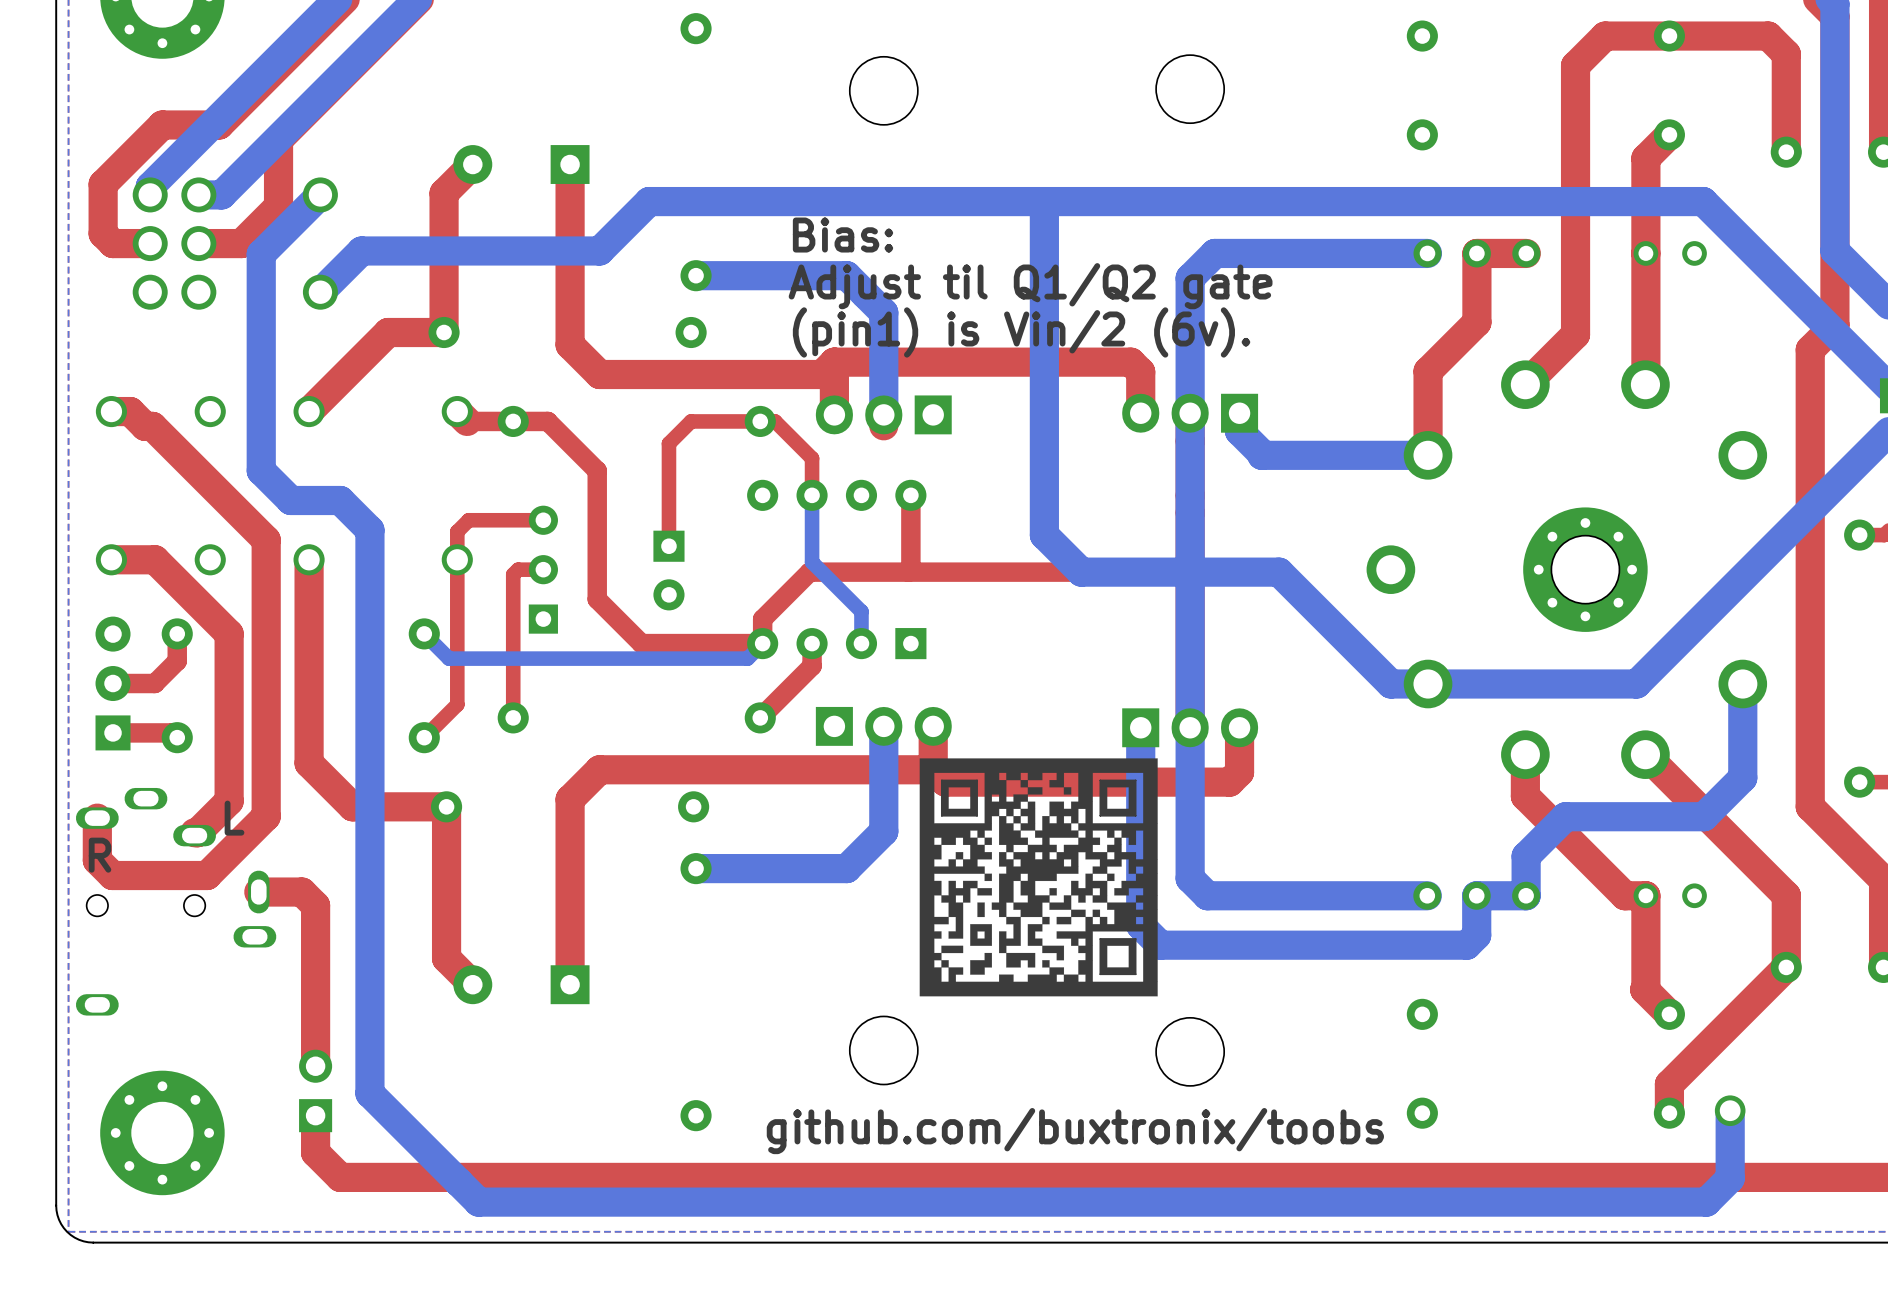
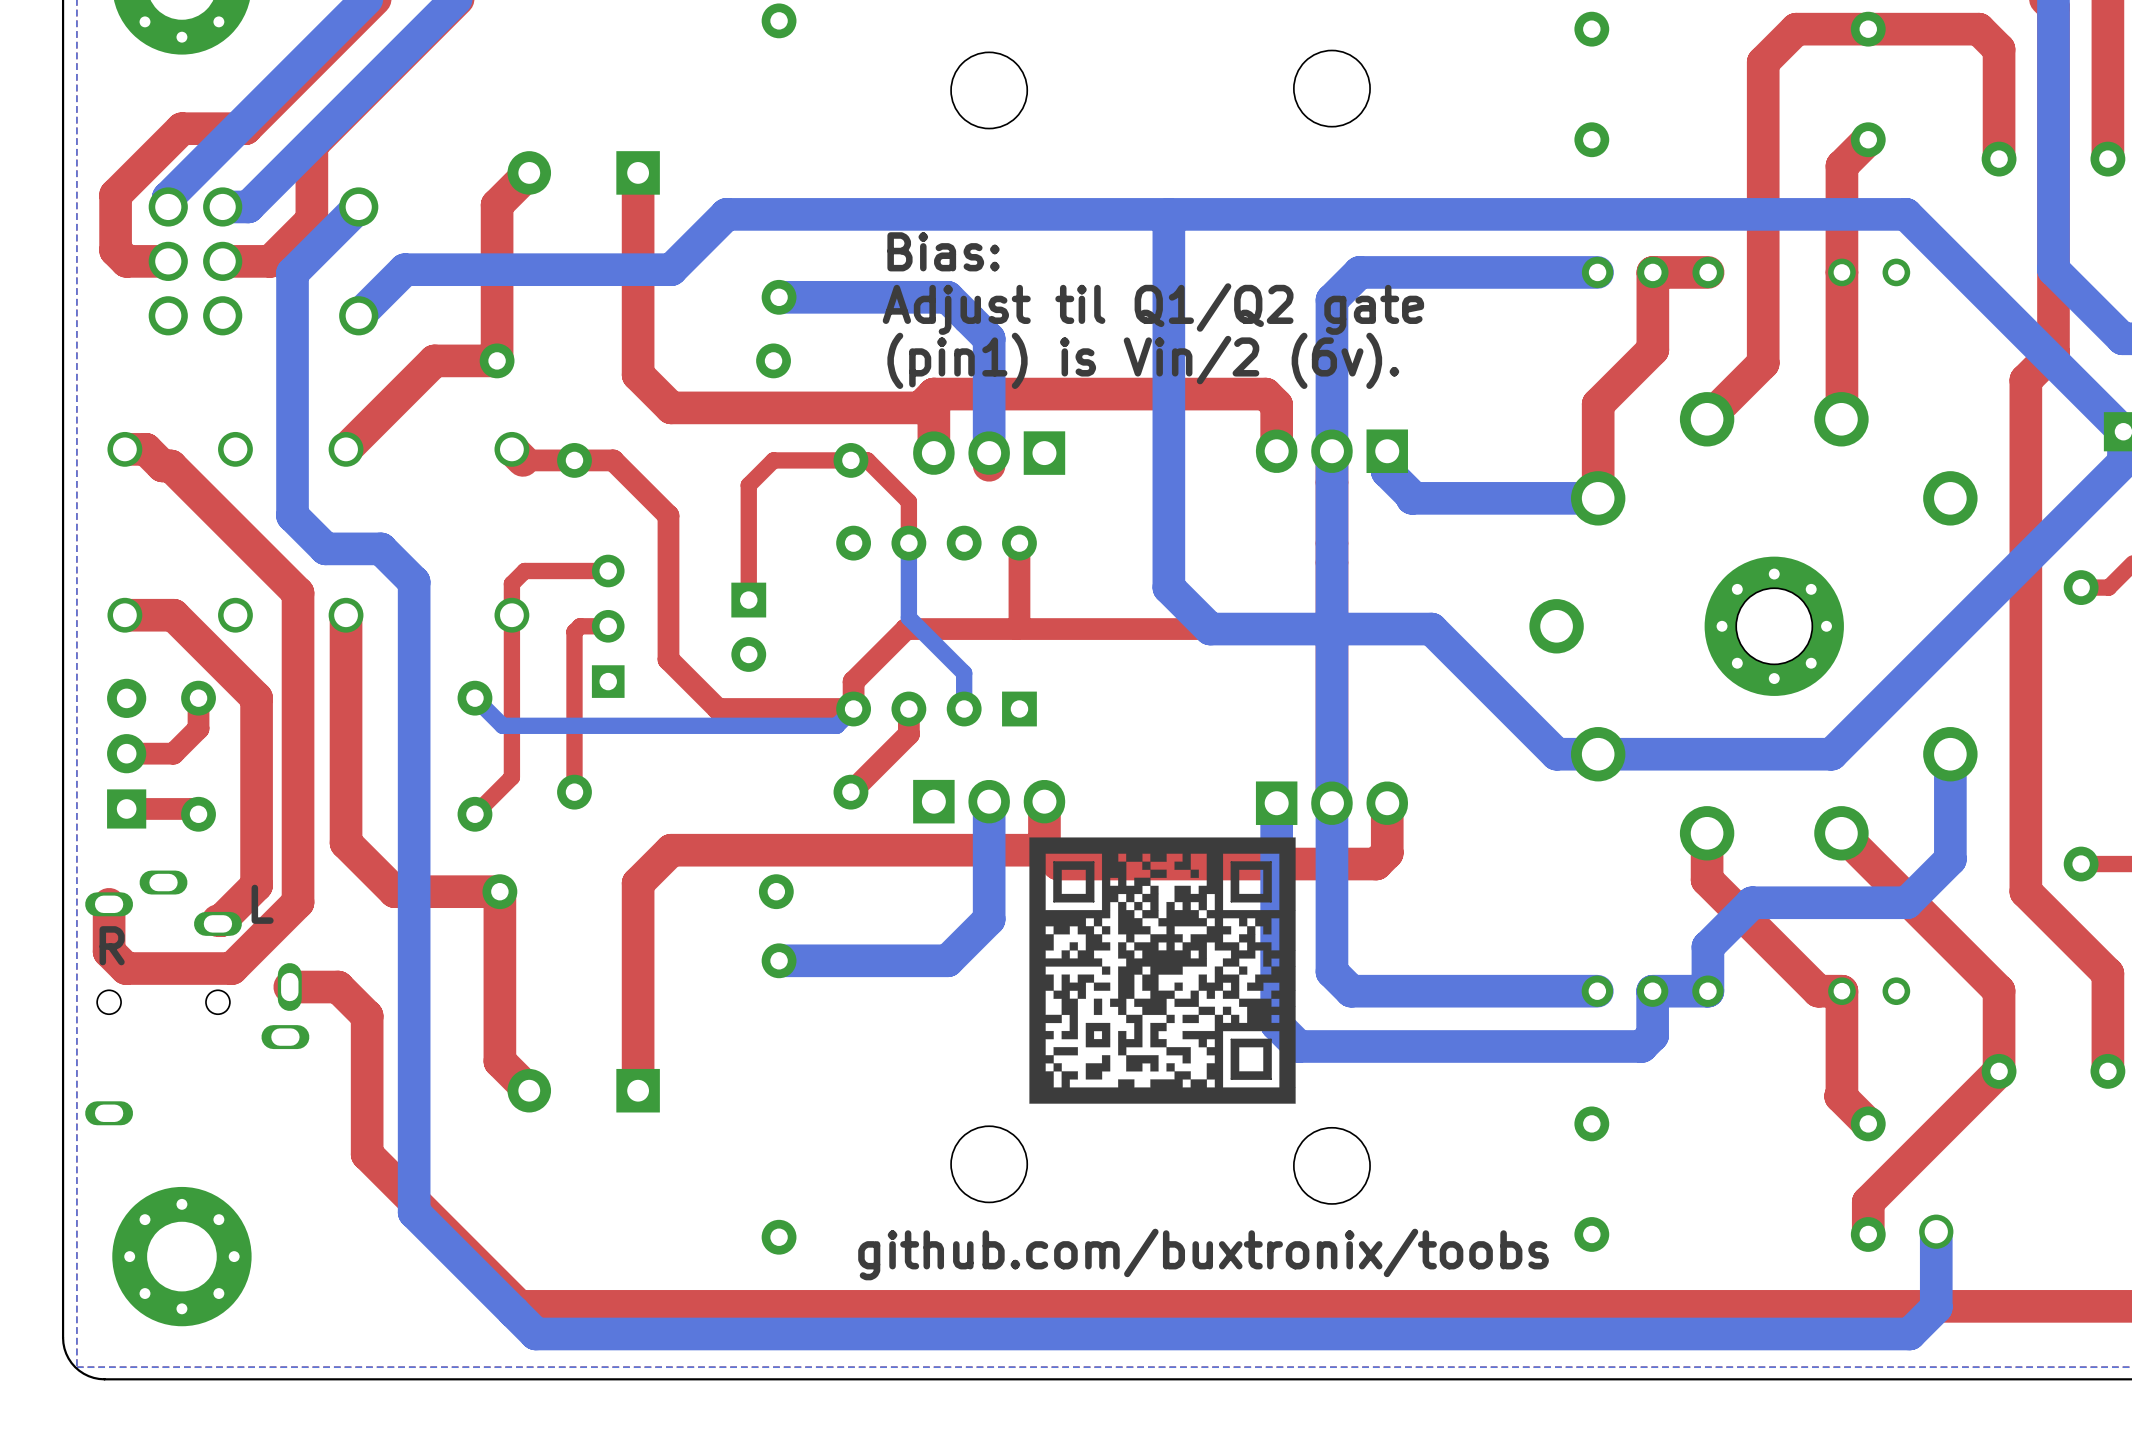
top track: (315, 905) (315, 1066) -> (353, 1002) (367, 1016) (367, 1154) (519, 1306)
part: (315, 1090) -> none
top track: (315, 1115) (315, 1152) (340, 1177) (463, 1177) -> none

